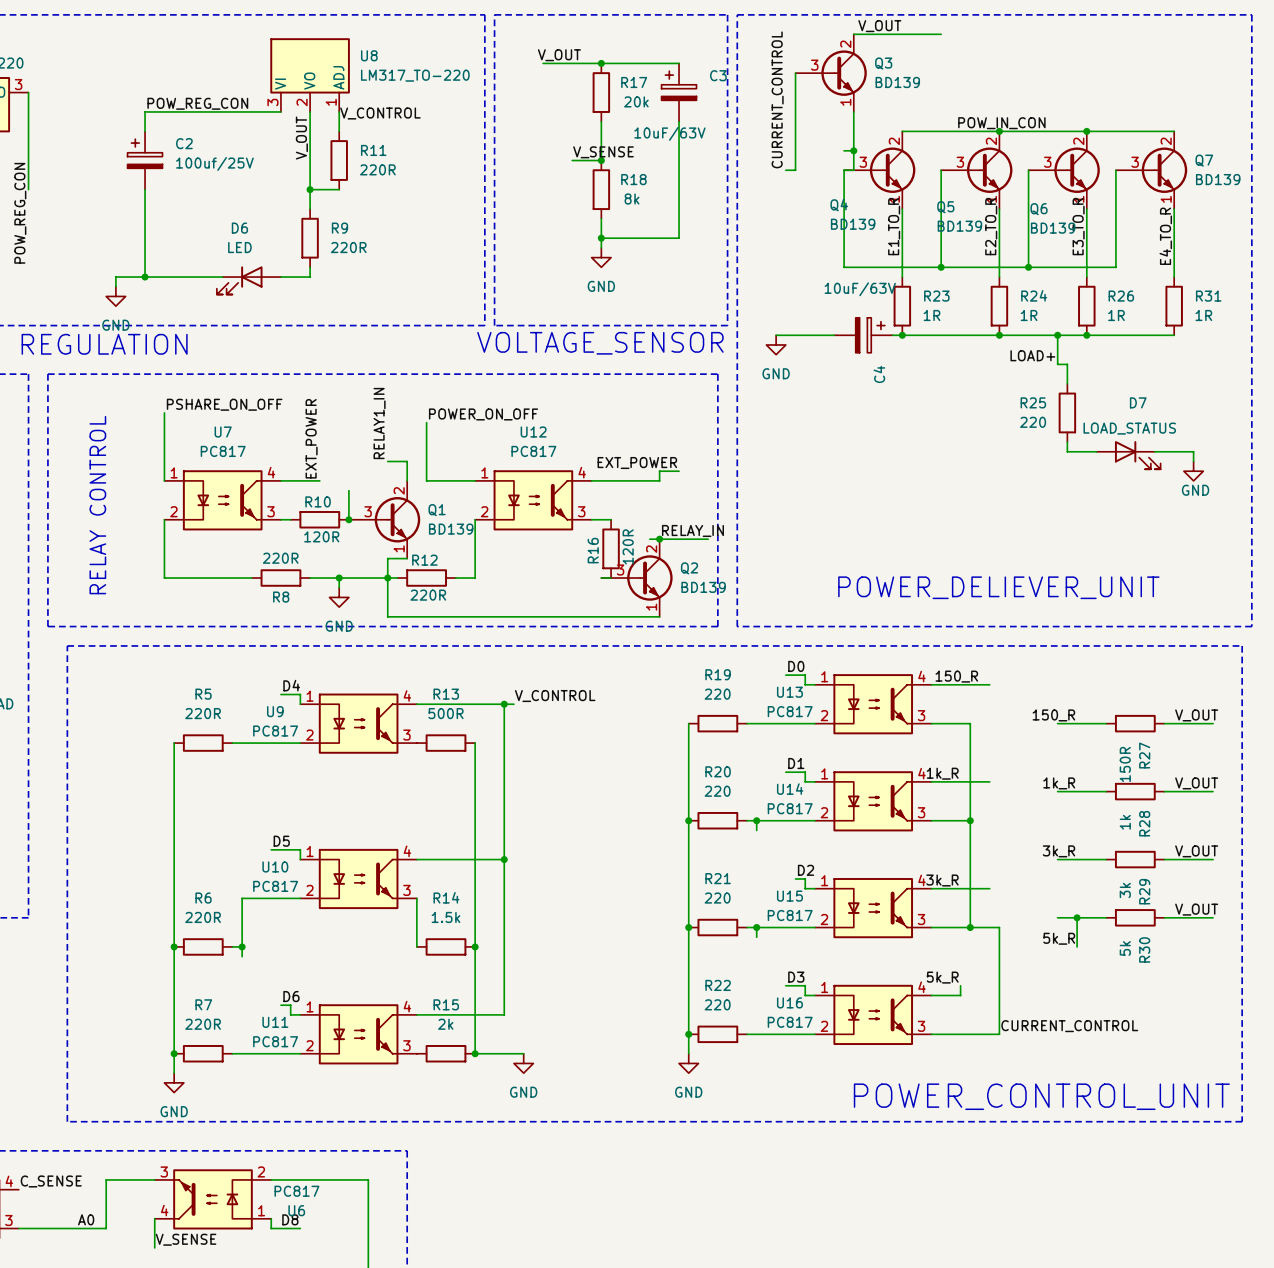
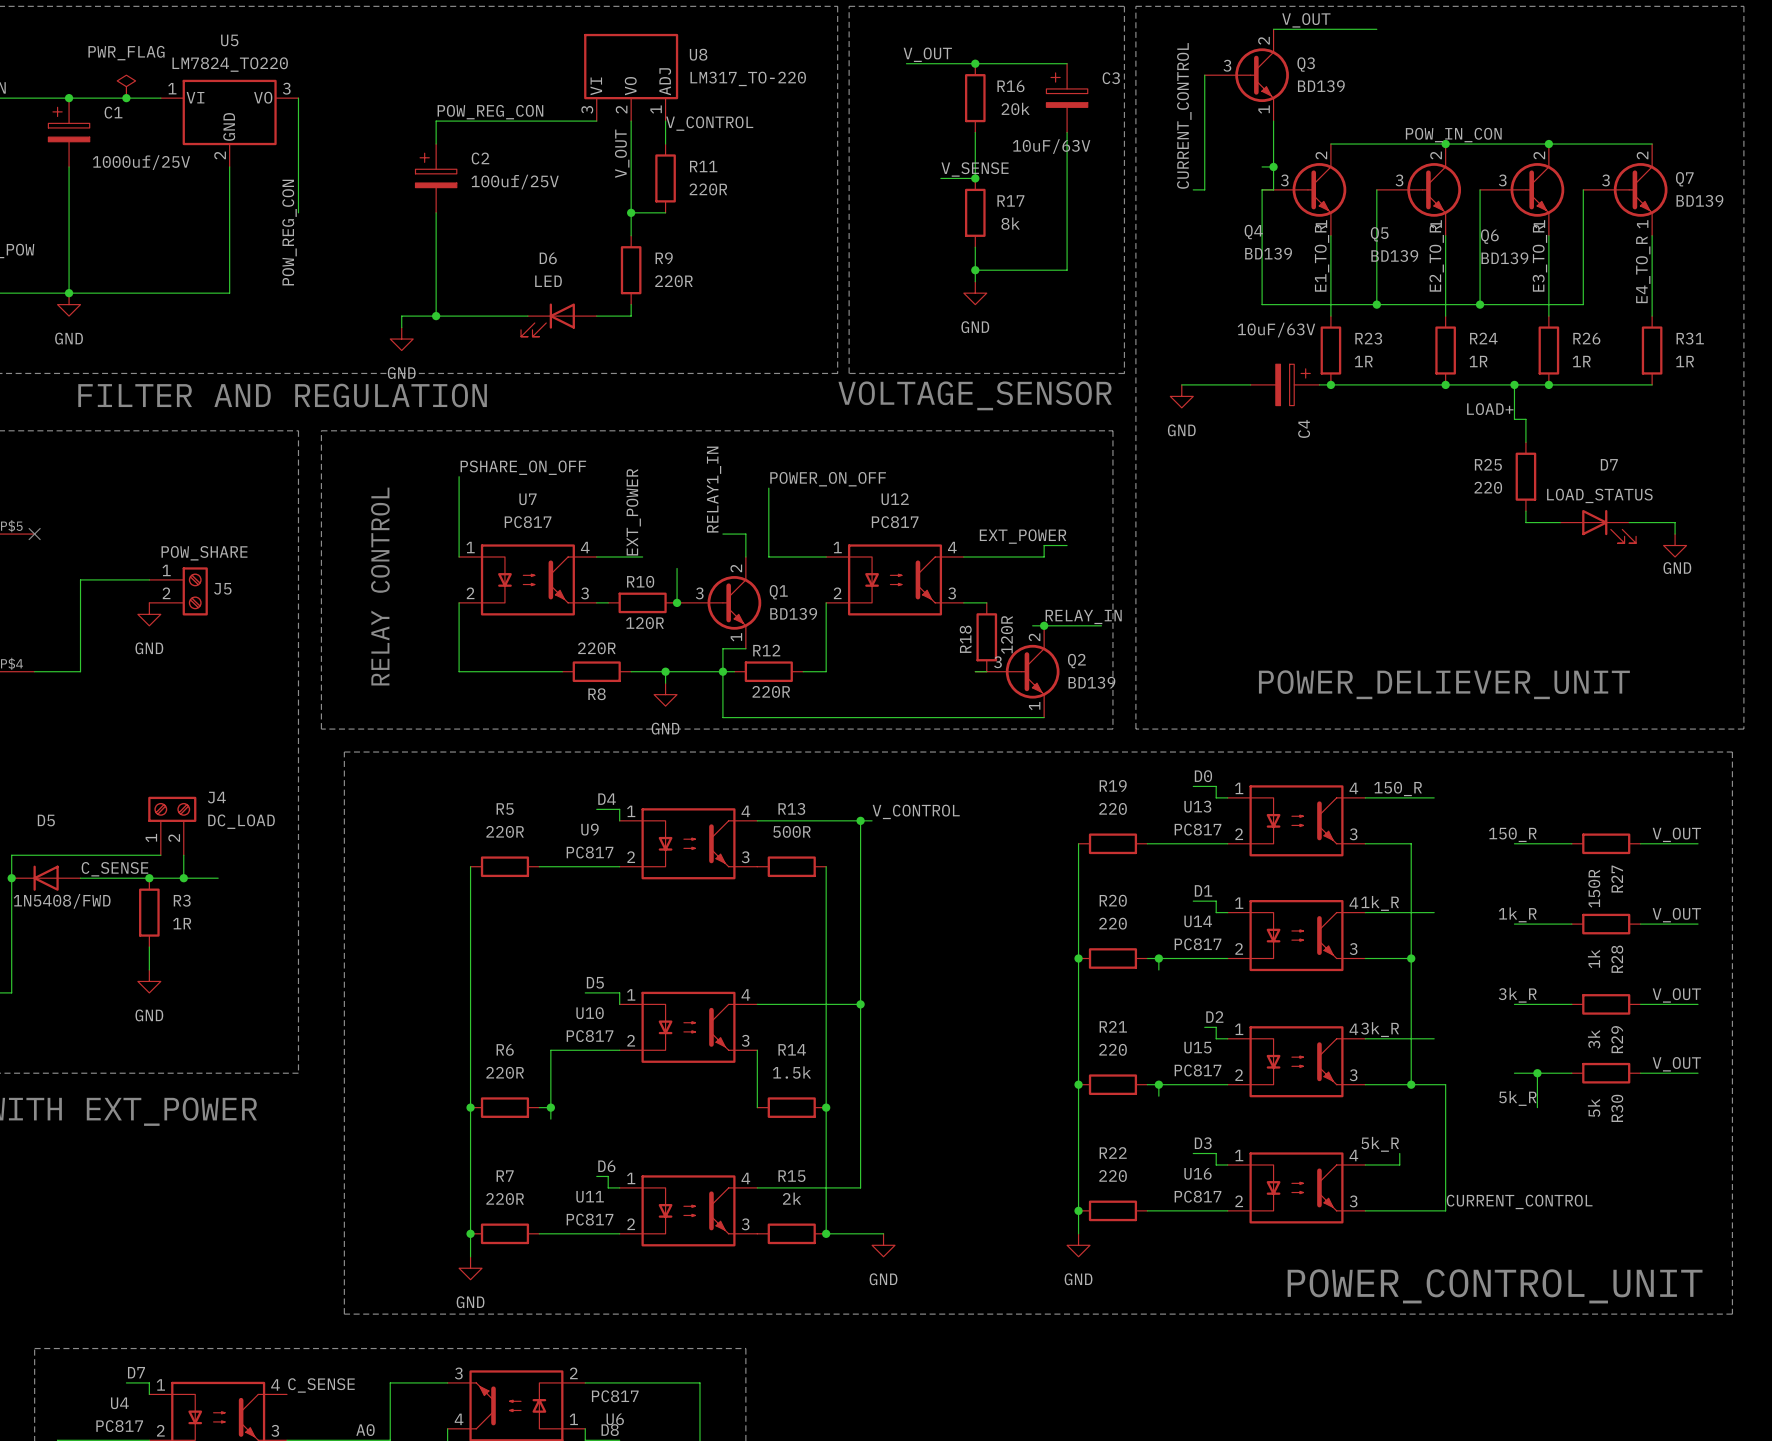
R17 name: R17 (634, 82) -> R16 (1010, 86)
R18 name: R18 (633, 179) -> R17 (1010, 200)
R16 name: R16 (593, 550) -> R18 (965, 639)

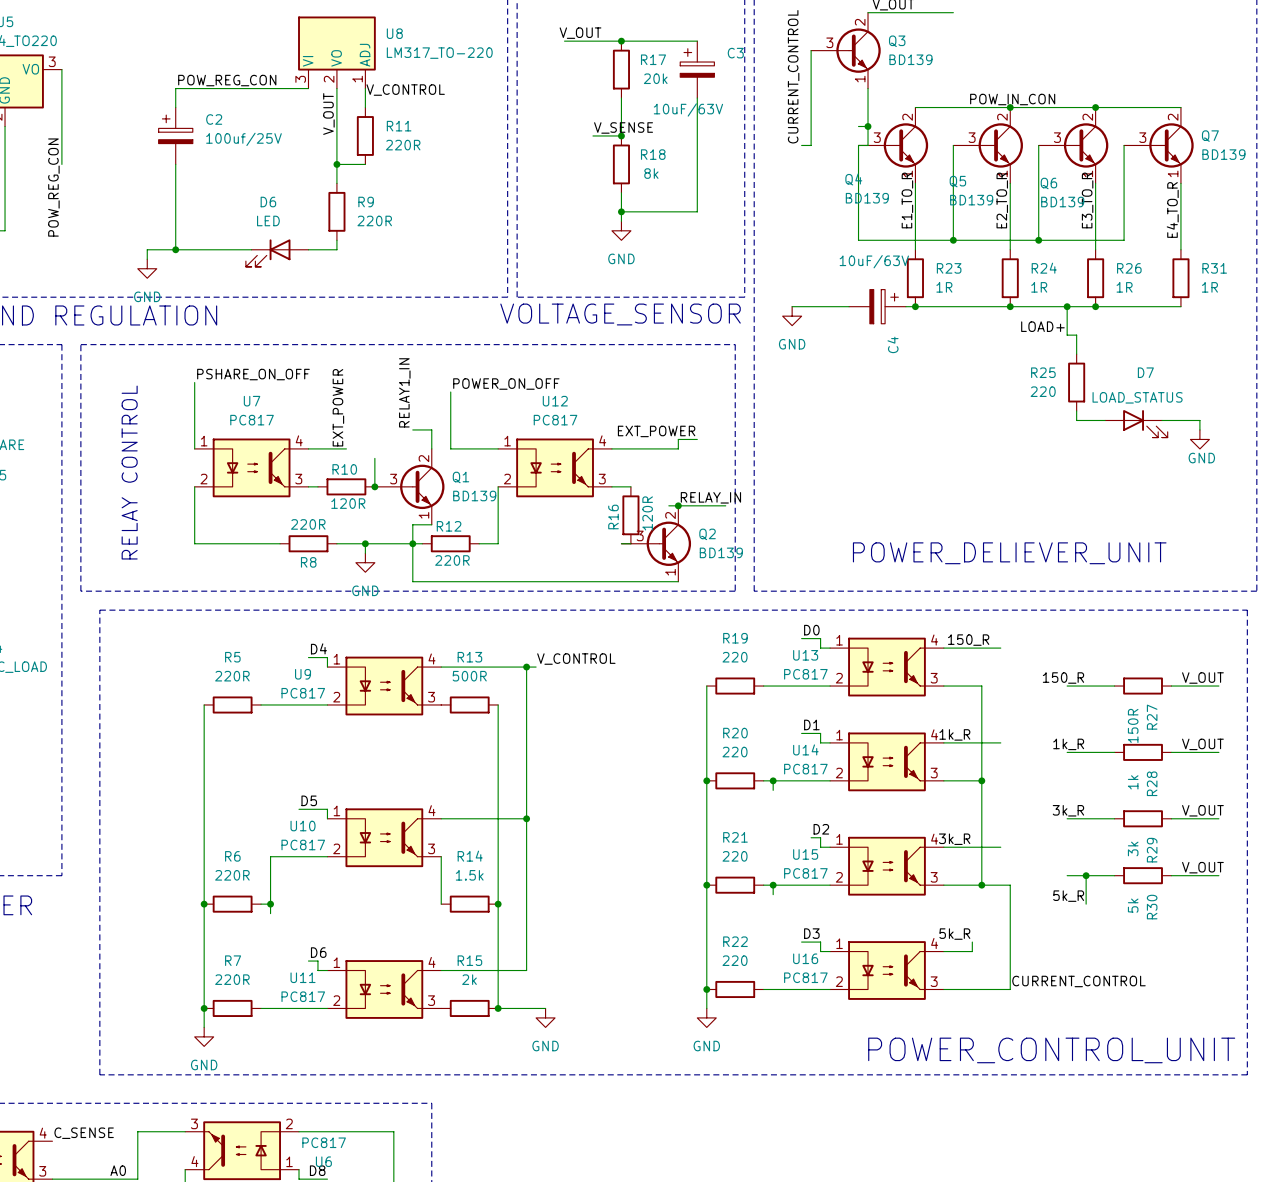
R16 name: R16 (1010, 86) -> R17 (653, 59)
R17 name: R17 (1010, 200) -> R18 (653, 154)
R18 name: R18 (965, 639) -> R16 (613, 516)

